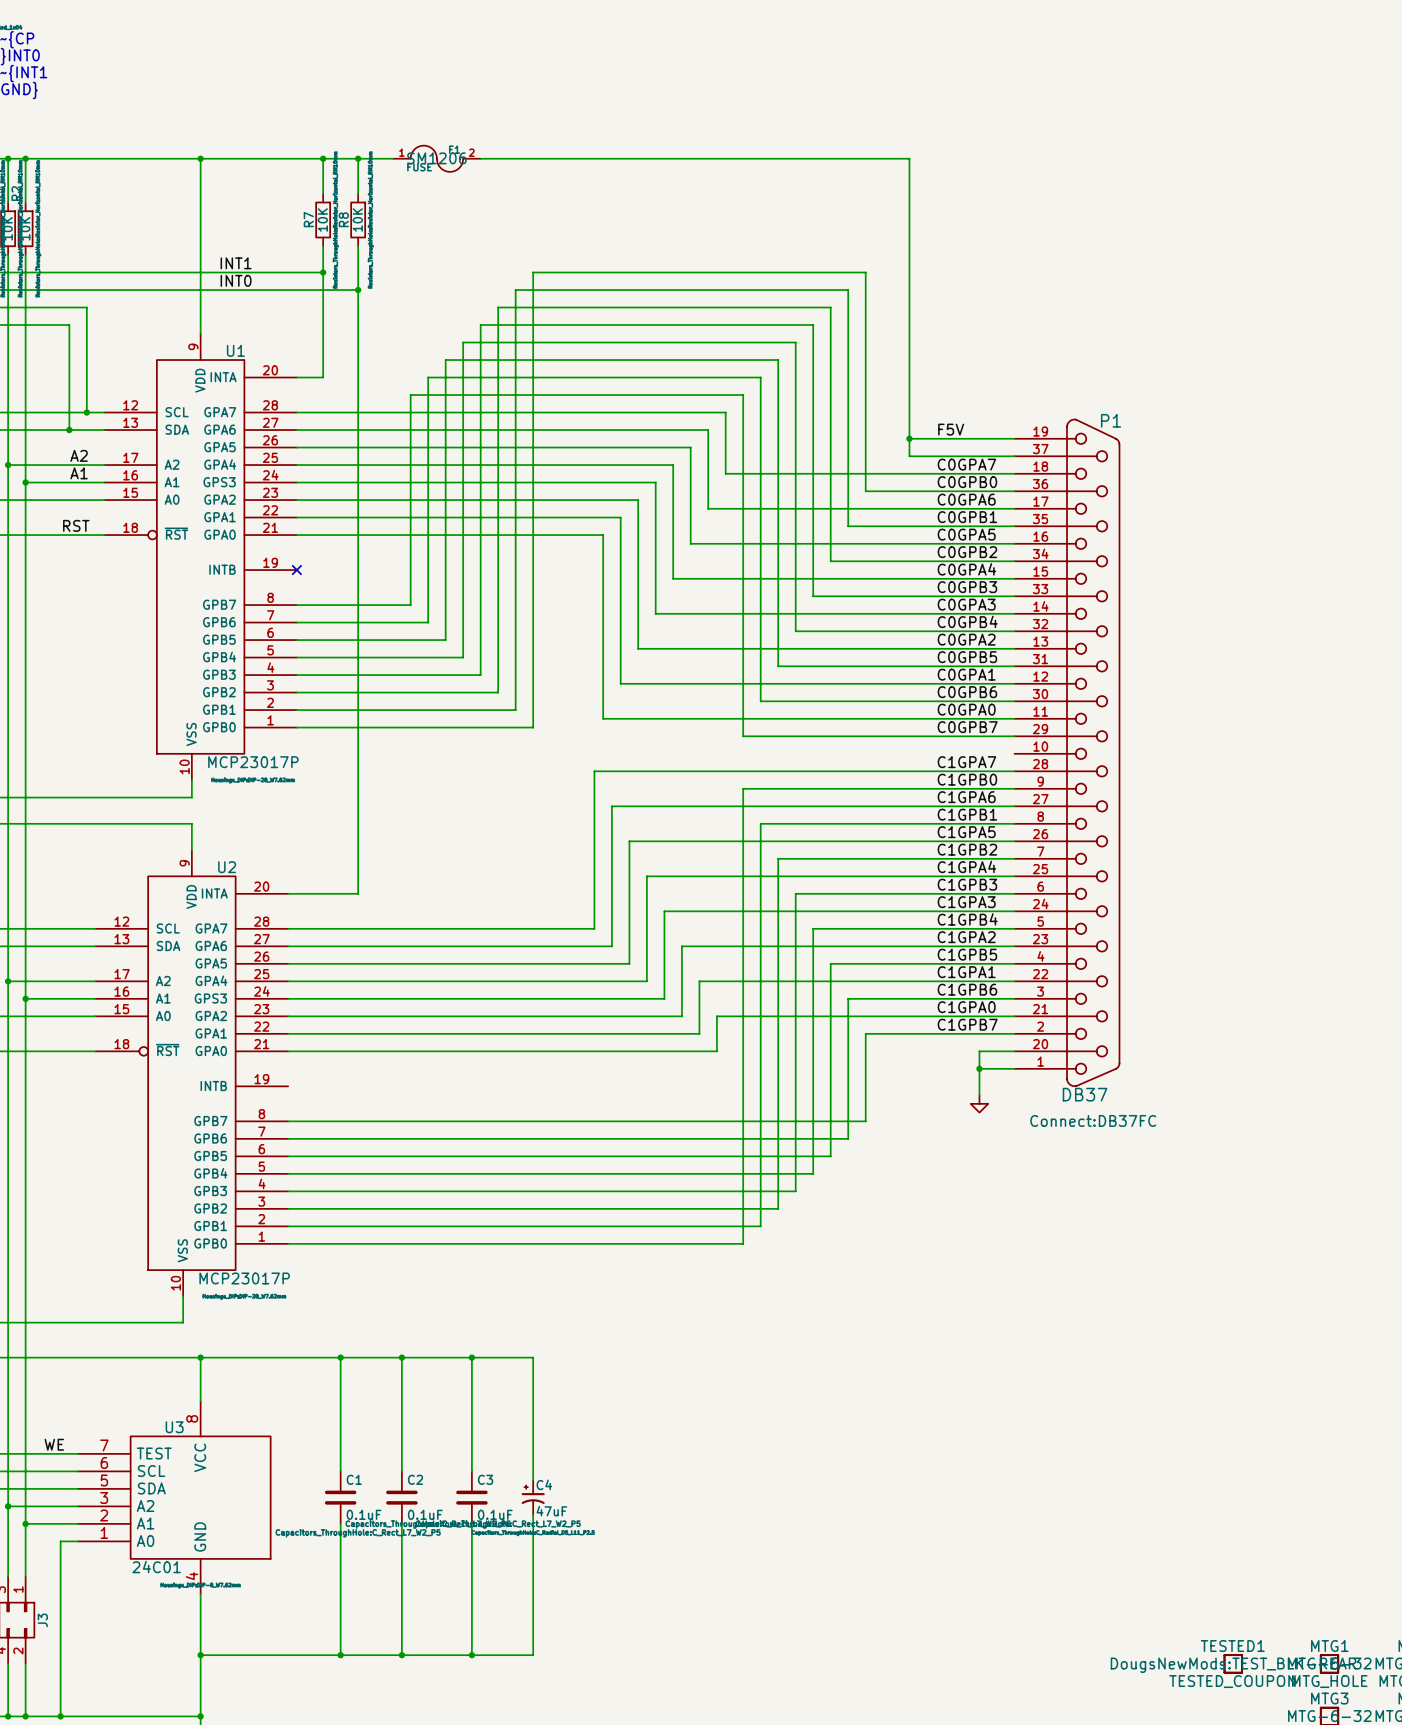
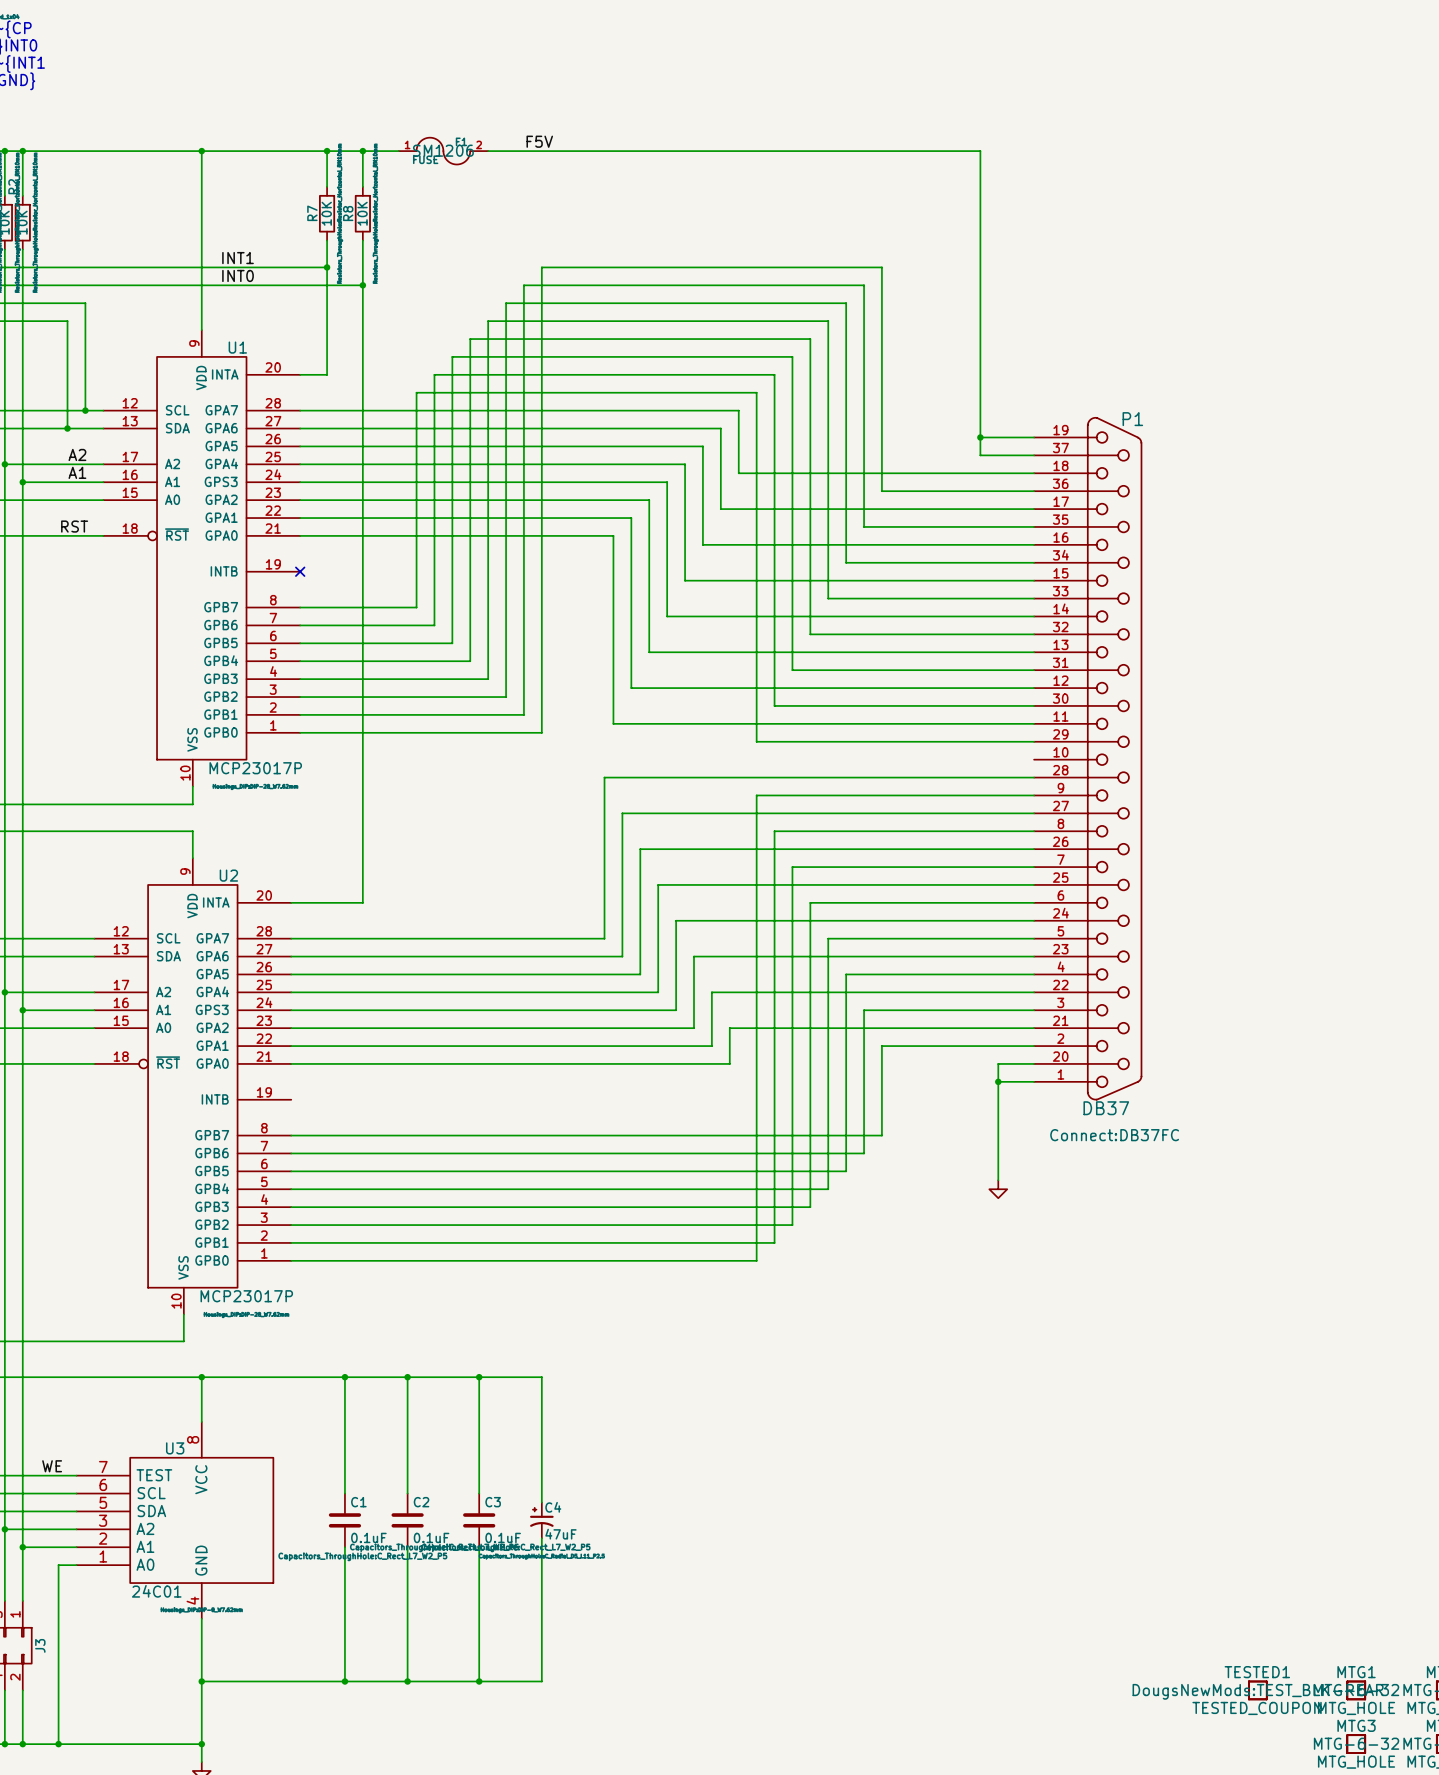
label: none -> F5V (539, 141)
wire: (909, 158) (909, 456) (961, 456) -> (926, 151) (980, 151) (980, 455)
label: F5V (951, 429) -> none
wire: (909, 438) (961, 438) -> none
junction: (909, 438) -> none
junction: none -> (980, 437)
label: C0GPA7 (966, 464) -> none
label: C0GPB0 (967, 482) -> none
label: C0GPA6 (966, 499) -> none
label: C0GPB1 (967, 517) -> none
label: C0GPA5 (966, 534) -> none
label: C0GPB2 (967, 552) -> none
label: C0GPA4 (966, 569) -> none
label: C0GPB3 (967, 587) -> none
label: C0GPA3 (966, 604) -> none
label: C0GPB4 (967, 621) -> none
label: C0GPA2 (966, 639) -> none
label: C0GPB5 (967, 657) -> none
label: C0GPA1 (966, 674) -> none
label: C0GPB6 (967, 692) -> none
label: C0GPA0 (966, 709) -> none
label: C0GPB7 (967, 727) -> none
label: C1GPA7 (966, 762) -> none
label: C1GPB0 (967, 779) -> none
label: C1GPA6 (966, 797) -> none
label: C1GPB1 (967, 814) -> none
label: C1GPA5 (966, 832) -> none
label: C1GPB2 (967, 849) -> none
label: C1GPA4 (966, 866) -> none
label: C1GPB3 (967, 884) -> none
label: C1GPA3 (966, 902) -> none
label: C1GPB4 (967, 919) -> none
label: C1GPA2 (966, 937) -> none
label: C1GPB5 (967, 954) -> none
label: C1GPA1 (966, 972) -> none
label: C1GPB6 (967, 989) -> none
label: C1GPA0 (966, 1007) -> none
label: C1GPB7 (967, 1024) -> none
wire: none -> (998, 1108) (998, 1180)
power symbol position: (979, 1103) -> (998, 1189)

